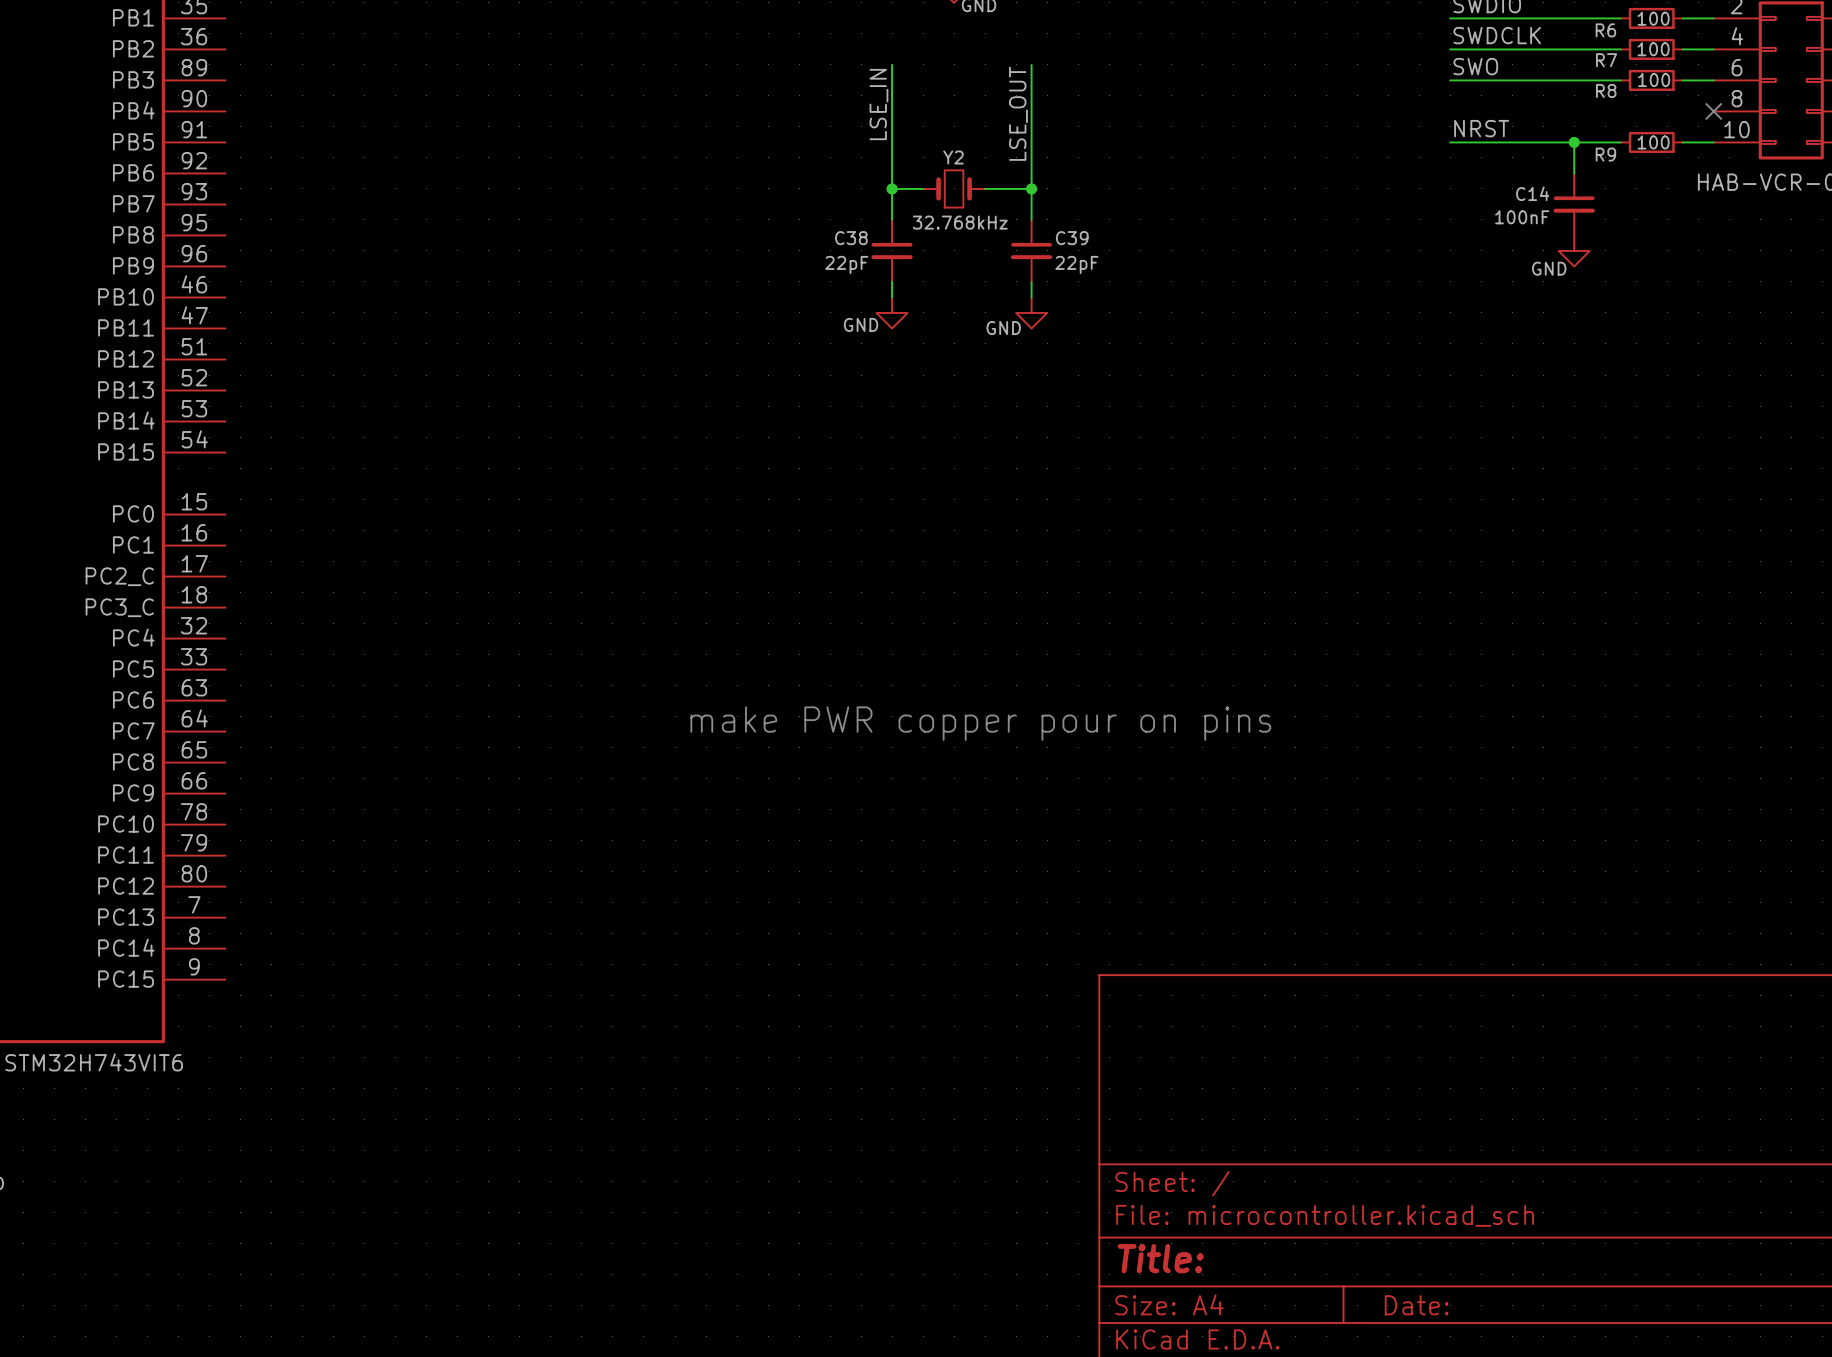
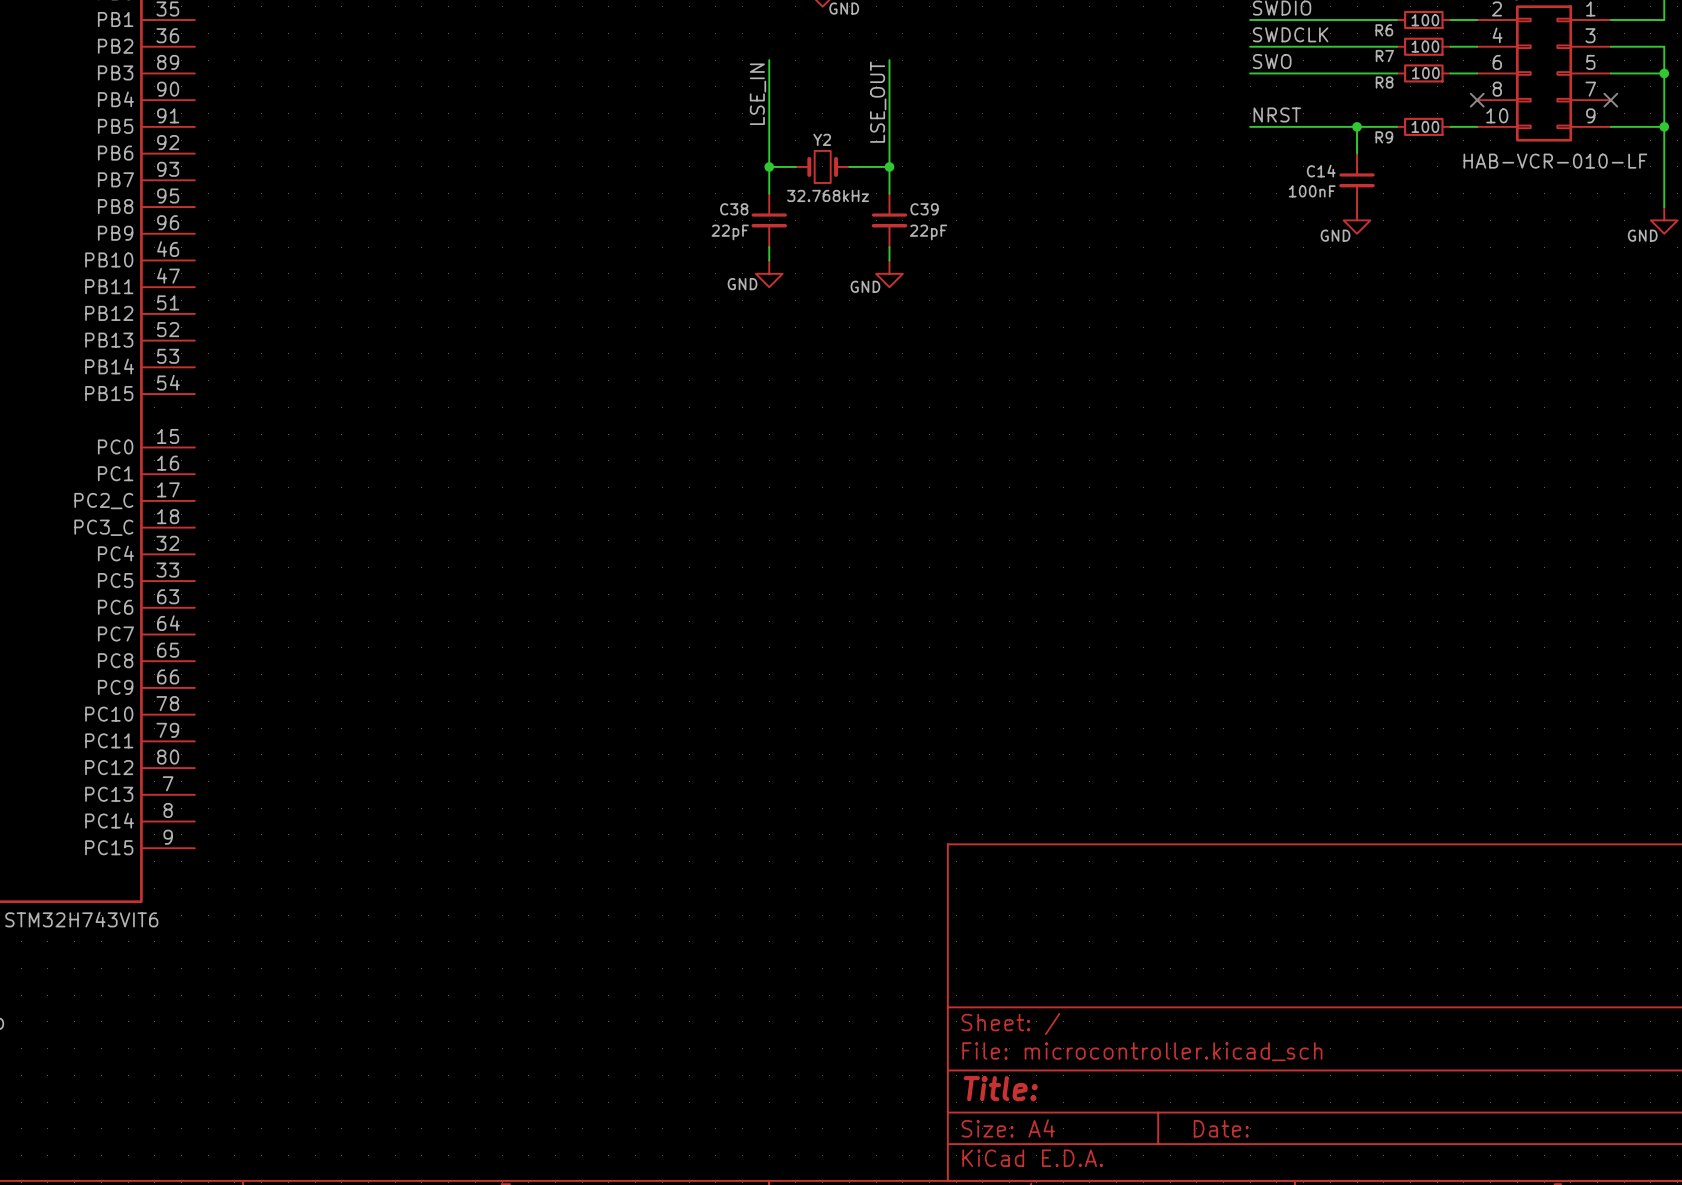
text: make PWR copper pour on pins (980, 723) -> none

